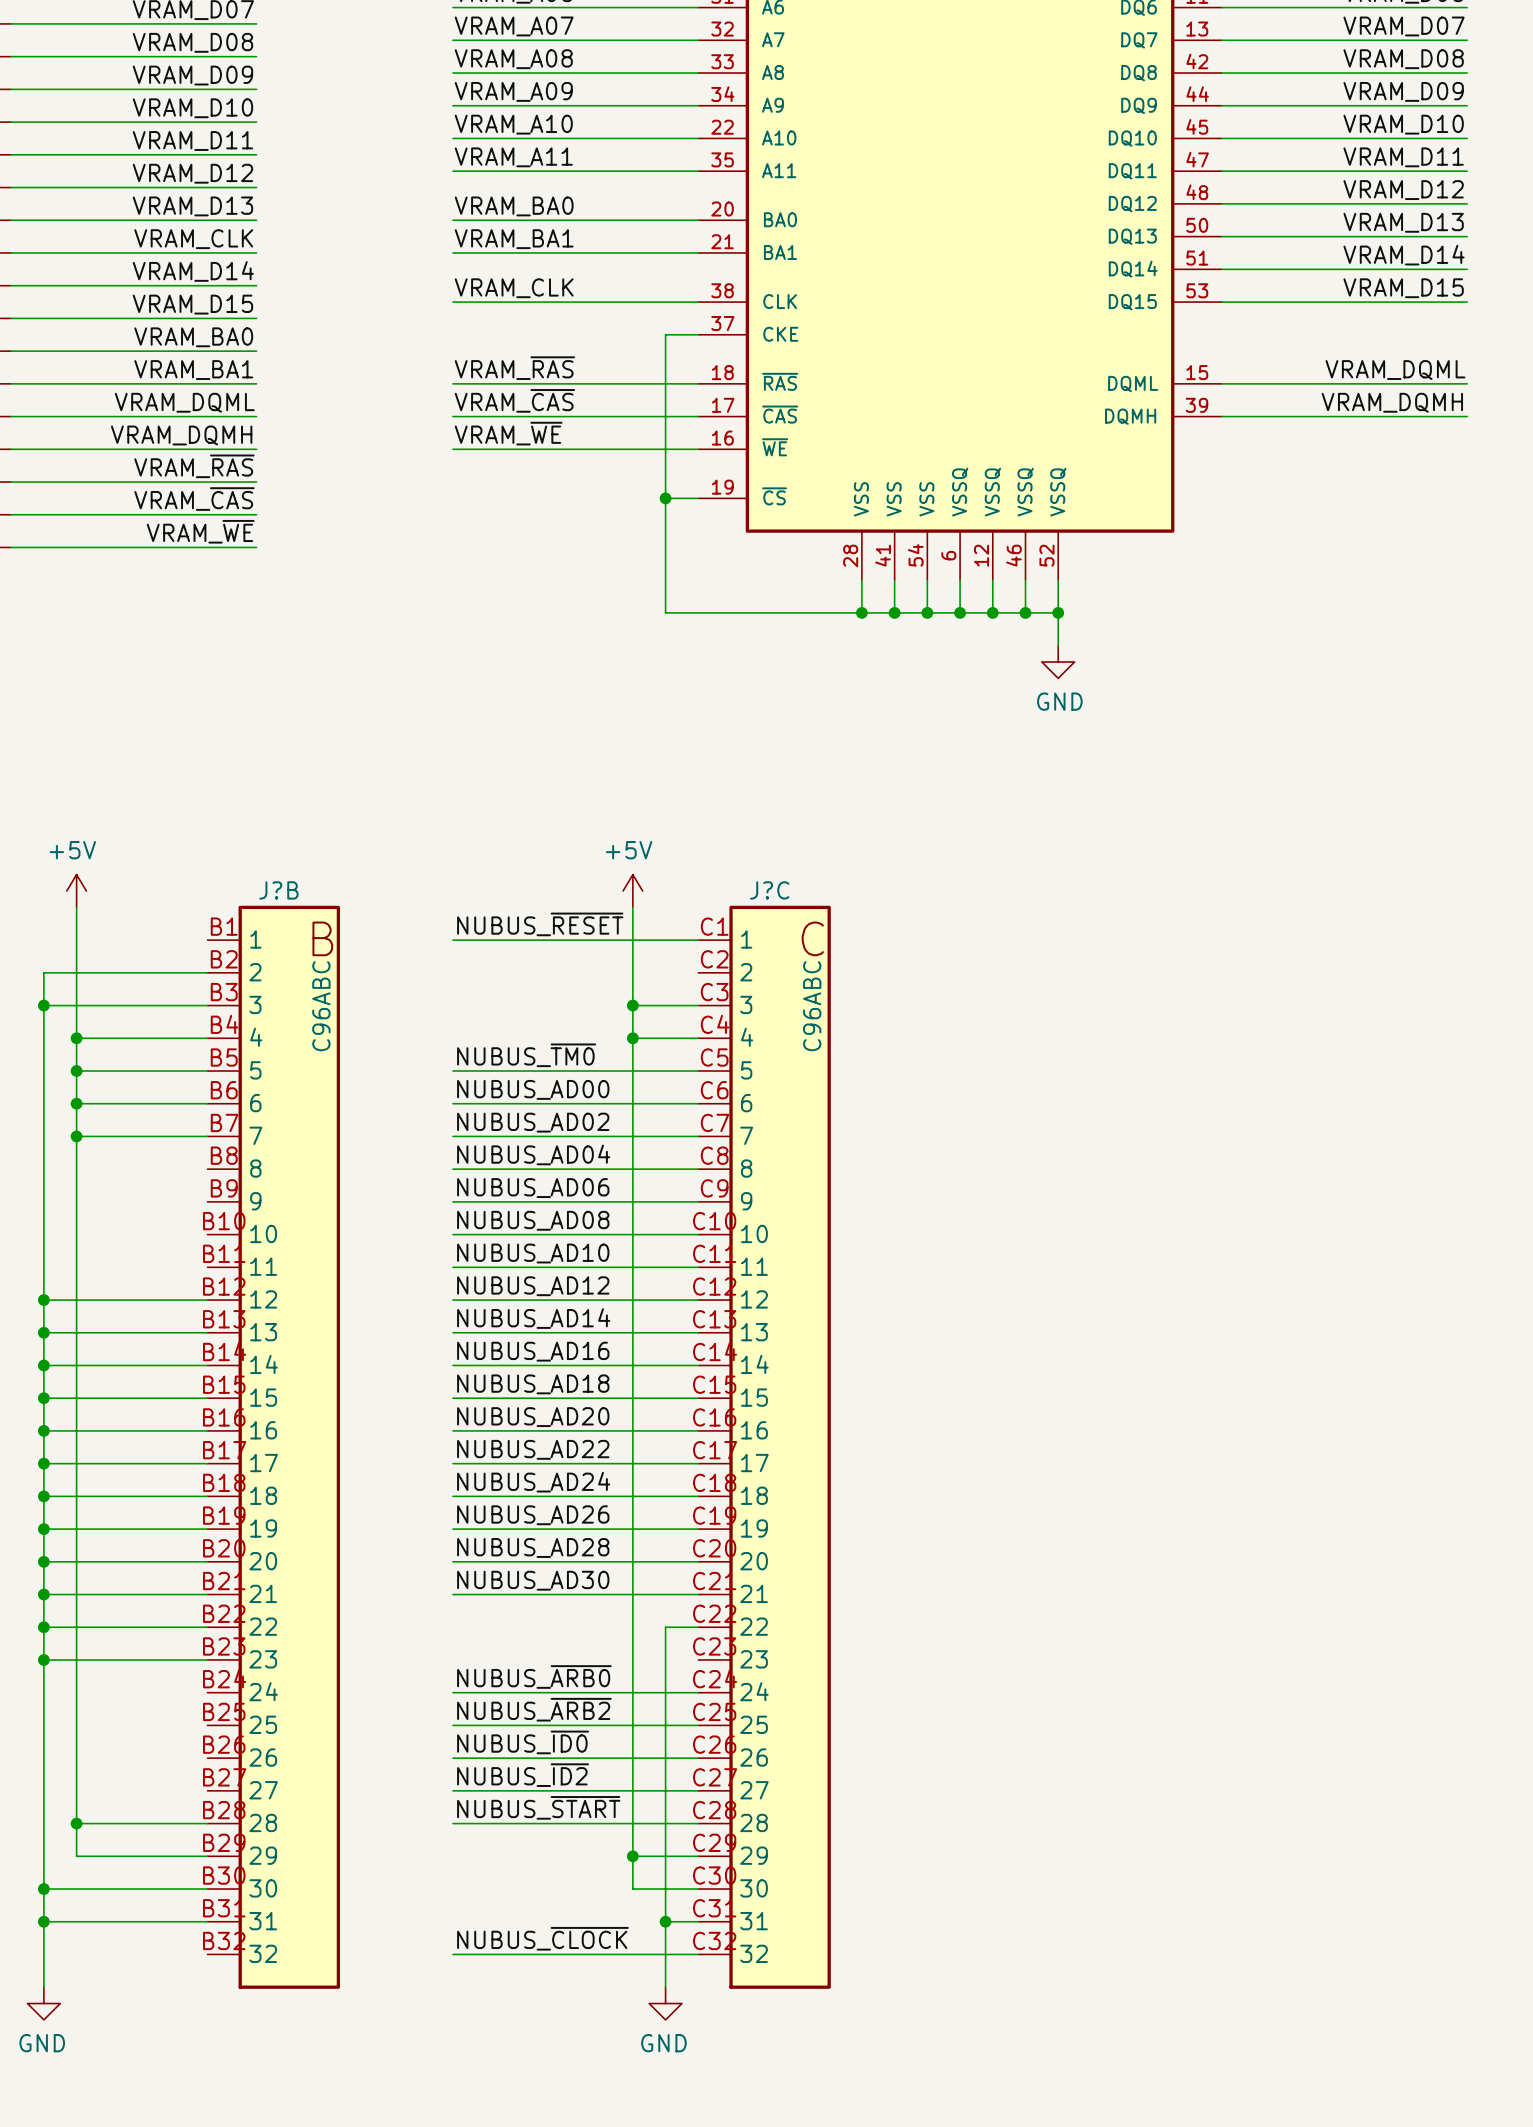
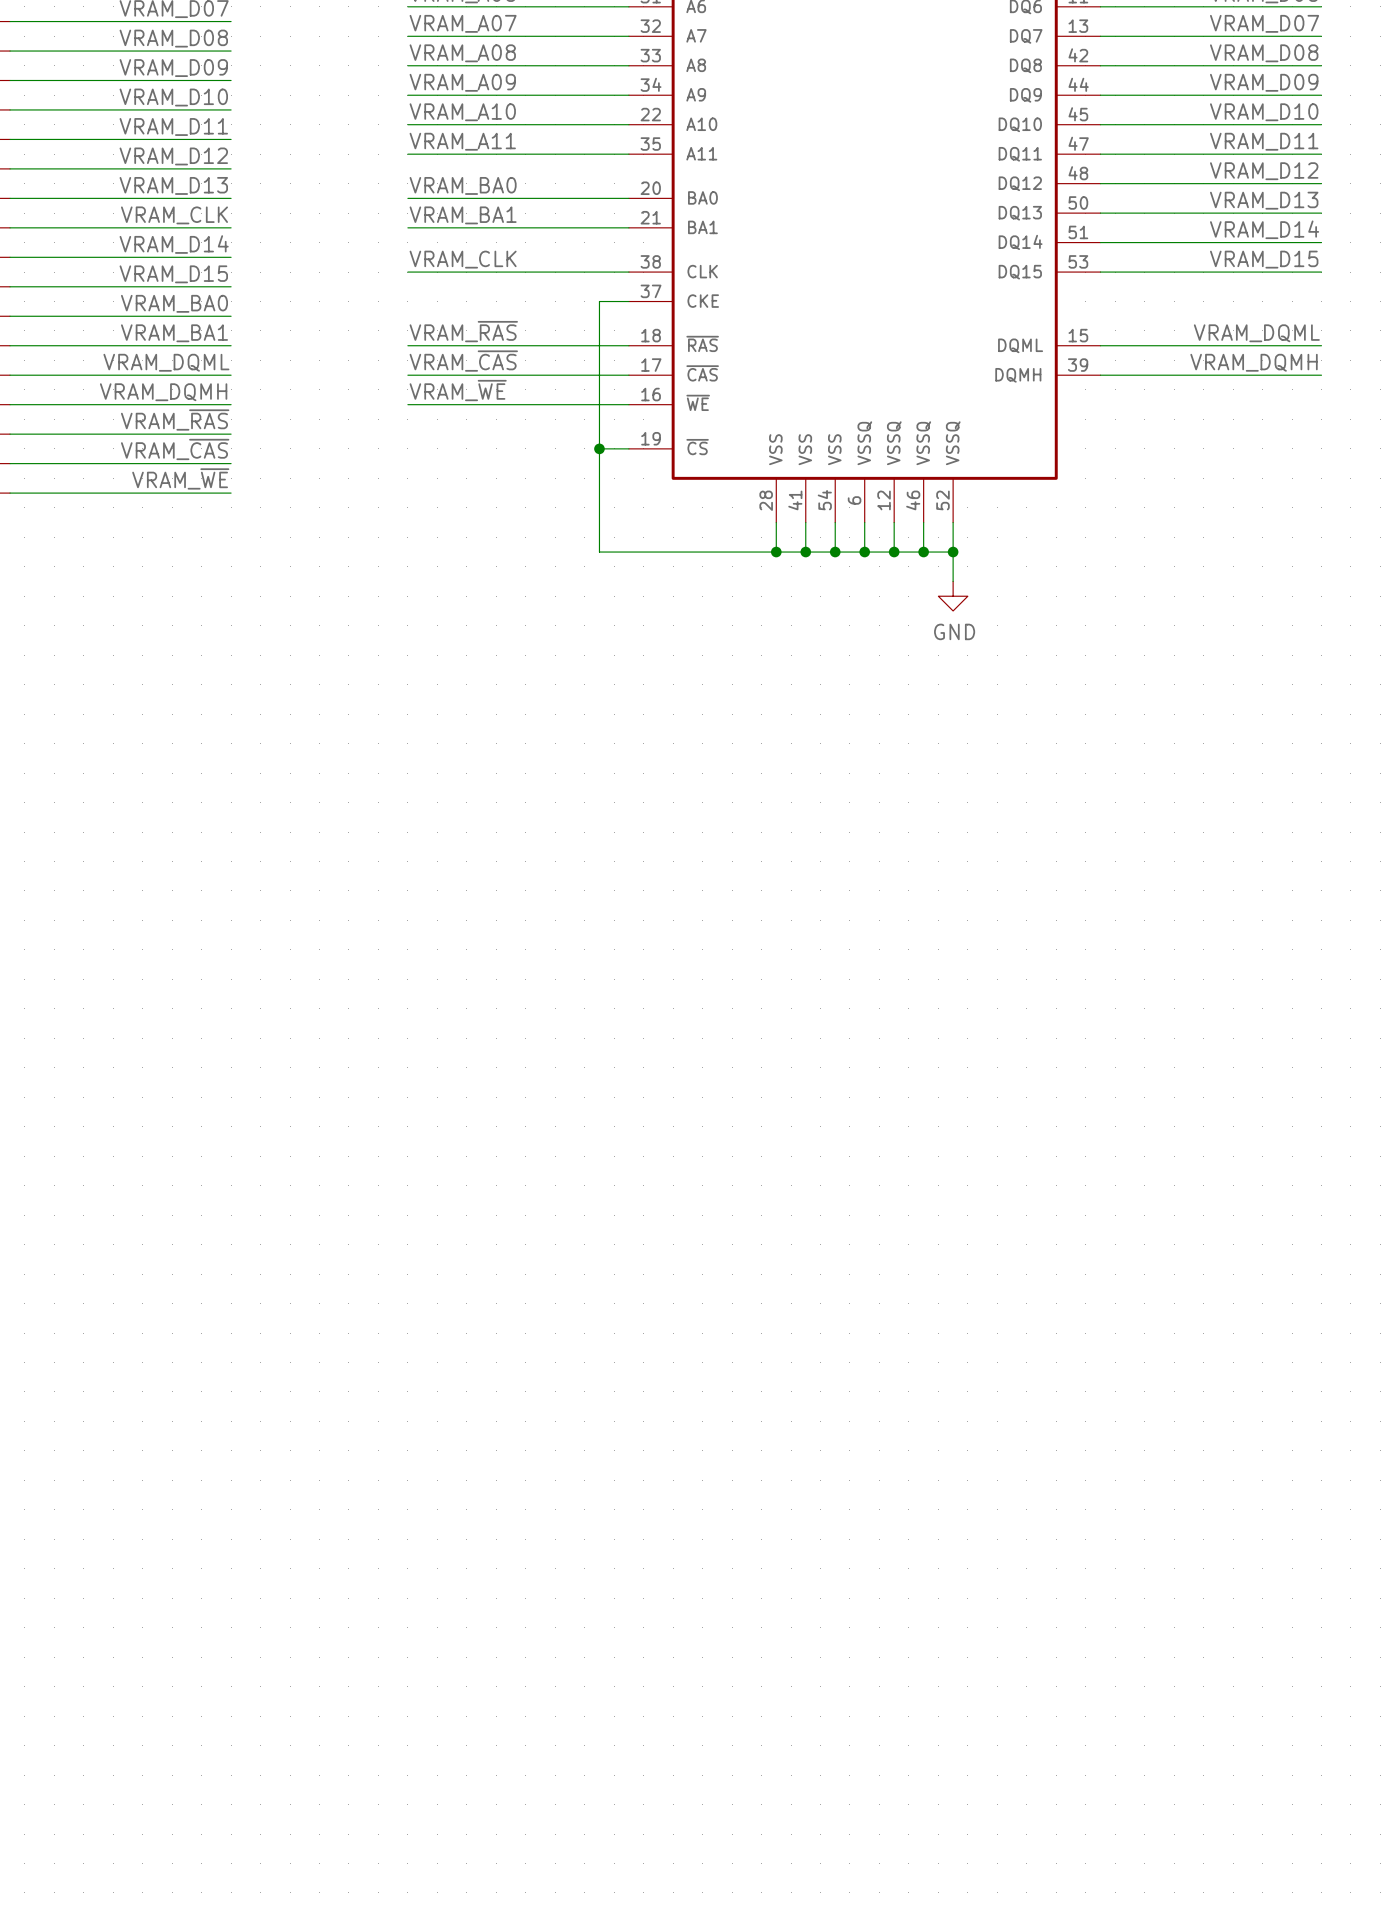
power symbol: +5V (76, 891) -> none
power symbol: +5V (632, 891) -> none
wire: (76, 907) (76, 1856) (207, 1856) -> none
wire: (632, 907) (632, 1889) (698, 1889) -> none
label: NUBUS_~{RESET} (540, 924) -> none
wire: (452, 940) (698, 940) -> none
wire: (207, 972) (43, 972) (43, 1987) -> none
wire: (43, 1005) (207, 1005) -> none
junction: (43, 1005) -> none
wire: (632, 1005) (698, 1005) -> none
junction: (632, 1005) -> none
wire: (76, 1038) (207, 1038) -> none
junction: (76, 1038) -> none
wire: (632, 1038) (698, 1038) -> none
junction: (632, 1038) -> none
label: NUBUS_~{TM0} (526, 1055) -> none
wire: (76, 1071) (207, 1071) -> none
junction: (76, 1071) -> none
wire: (452, 1071) (698, 1071) -> none
label: NUBUS_AD00 (533, 1089) -> none
wire: (76, 1103) (207, 1103) -> none
junction: (76, 1103) -> none
wire: (452, 1103) (698, 1103) -> none
label: NUBUS_AD02 (533, 1122) -> none
wire: (76, 1136) (207, 1136) -> none
junction: (76, 1136) -> none
wire: (452, 1136) (698, 1136) -> none
label: NUBUS_AD04 (533, 1154) -> none
wire: (452, 1169) (698, 1169) -> none
label: NUBUS_AD06 (533, 1188) -> none
wire: (452, 1201) (698, 1201) -> none
label: NUBUS_AD08 (533, 1220) -> none
wire: (452, 1234) (698, 1234) -> none
label: NUBUS_AD10 (533, 1253) -> none
wire: (452, 1267) (698, 1267) -> none
label: NUBUS_AD12 (533, 1286) -> none
wire: (43, 1300) (207, 1300) -> none
junction: (43, 1300) -> none
wire: (452, 1300) (698, 1300) -> none
label: NUBUS_AD14 (533, 1318) -> none
wire: (43, 1332) (207, 1332) -> none
junction: (43, 1332) -> none
wire: (452, 1332) (698, 1332) -> none
label: NUBUS_AD16 (533, 1351) -> none
wire: (43, 1365) (207, 1365) -> none
junction: (43, 1365) -> none
wire: (452, 1365) (698, 1365) -> none
label: NUBUS_AD18 (533, 1384) -> none
wire: (43, 1398) (207, 1398) -> none
junction: (43, 1398) -> none
wire: (452, 1398) (698, 1398) -> none
label: NUBUS_AD20 (533, 1417) -> none
wire: (43, 1430) (207, 1430) -> none
junction: (43, 1430) -> none
wire: (452, 1430) (698, 1430) -> none
J?B: C96ABC (273, 1447) -> none
J?C: C96ABC (764, 1447) -> none
label: NUBUS_AD22 (533, 1449) -> none
wire: (43, 1463) (207, 1463) -> none
junction: (43, 1463) -> none
wire: (452, 1463) (698, 1463) -> none
label: NUBUS_AD24 (533, 1482) -> none
wire: (43, 1496) (207, 1496) -> none
junction: (43, 1496) -> none
wire: (452, 1496) (698, 1496) -> none
label: NUBUS_AD26 (533, 1515) -> none
wire: (43, 1529) (207, 1529) -> none
junction: (43, 1529) -> none
wire: (452, 1529) (698, 1529) -> none
label: NUBUS_AD28 (533, 1547) -> none
wire: (43, 1561) (207, 1561) -> none
junction: (43, 1561) -> none
wire: (452, 1561) (698, 1561) -> none
label: NUBUS_AD30 (533, 1580) -> none
wire: (43, 1594) (207, 1594) -> none
junction: (43, 1594) -> none
wire: (452, 1594) (698, 1594) -> none
wire: (43, 1627) (207, 1627) -> none
junction: (43, 1627) -> none
wire: (698, 1627) (665, 1627) (665, 1987) -> none
wire: (43, 1659) (207, 1659) -> none
junction: (43, 1659) -> none
label: NUBUS_~{ARB0} (534, 1676) -> none
wire: (452, 1692) (698, 1692) -> none
label: NUBUS_~{ARB2} (534, 1709) -> none
wire: (452, 1725) (698, 1725) -> none
label: NUBUS_~{ID0} (523, 1742) -> none
wire: (452, 1758) (698, 1758) -> none
label: NUBUS_~{ID2} (523, 1775) -> none
wire: (452, 1790) (698, 1790) -> none
label: NUBUS_~{START} (538, 1807) -> none
wire: (76, 1823) (207, 1823) -> none
junction: (76, 1823) -> none
wire: (452, 1823) (698, 1823) -> none
wire: (632, 1856) (698, 1856) -> none
junction: (632, 1856) -> none
wire: (43, 1889) (207, 1889) -> none
junction: (43, 1889) -> none
wire: (43, 1921) (207, 1921) -> none
junction: (43, 1921) -> none
wire: (665, 1921) (698, 1921) -> none
junction: (665, 1921) -> none
label: NUBUS_~{CLOCK} (542, 1938) -> none
wire: (452, 1954) (698, 1954) -> none
power symbol: GND (43, 2003) -> none
power symbol: GND (665, 2003) -> none

